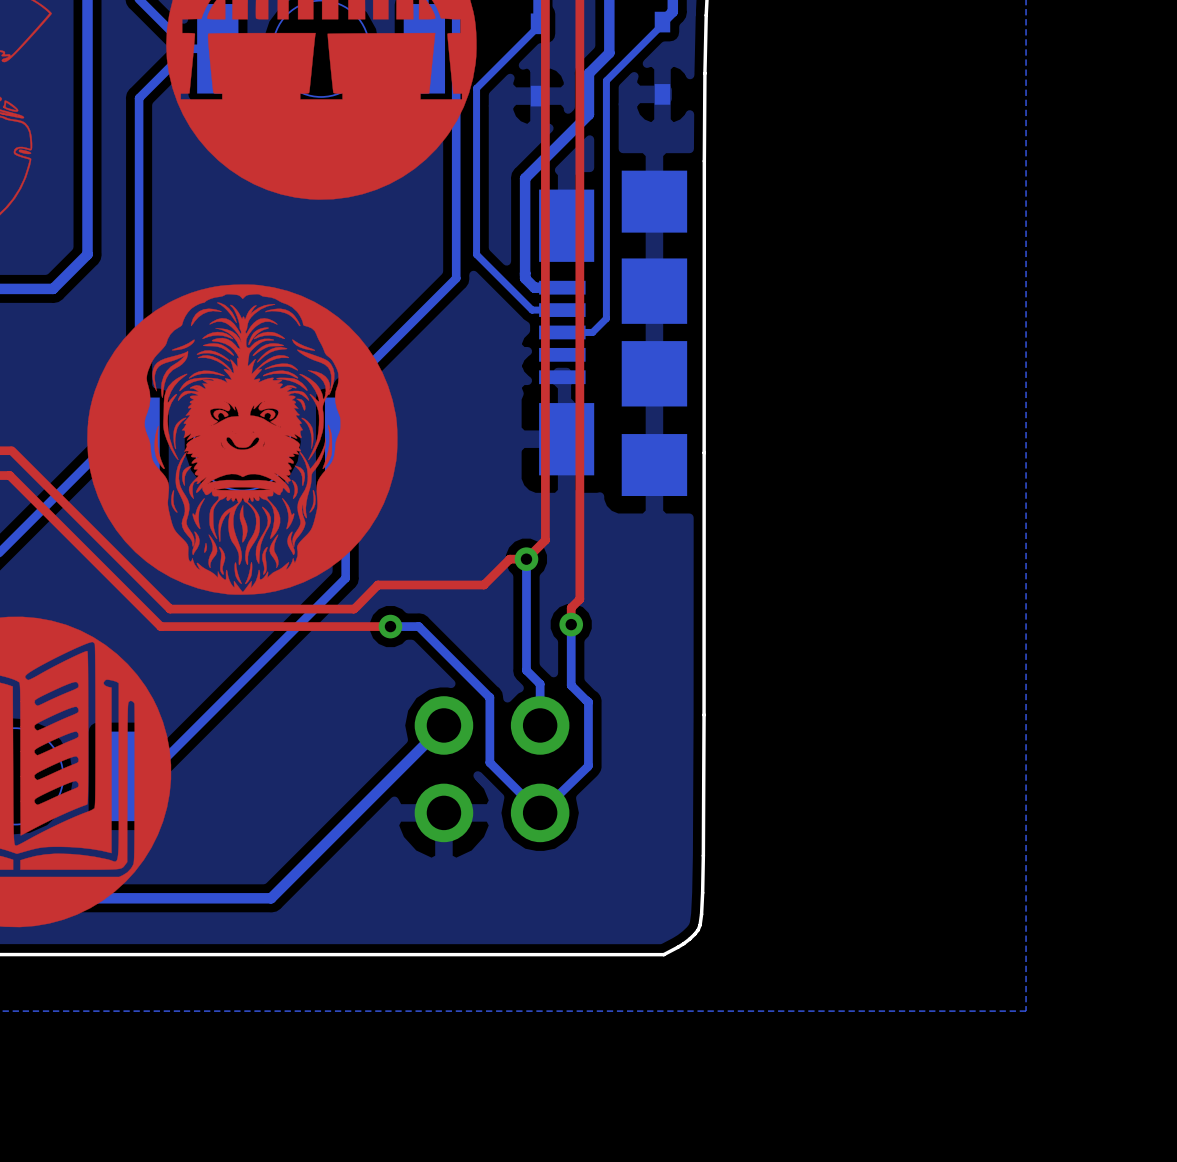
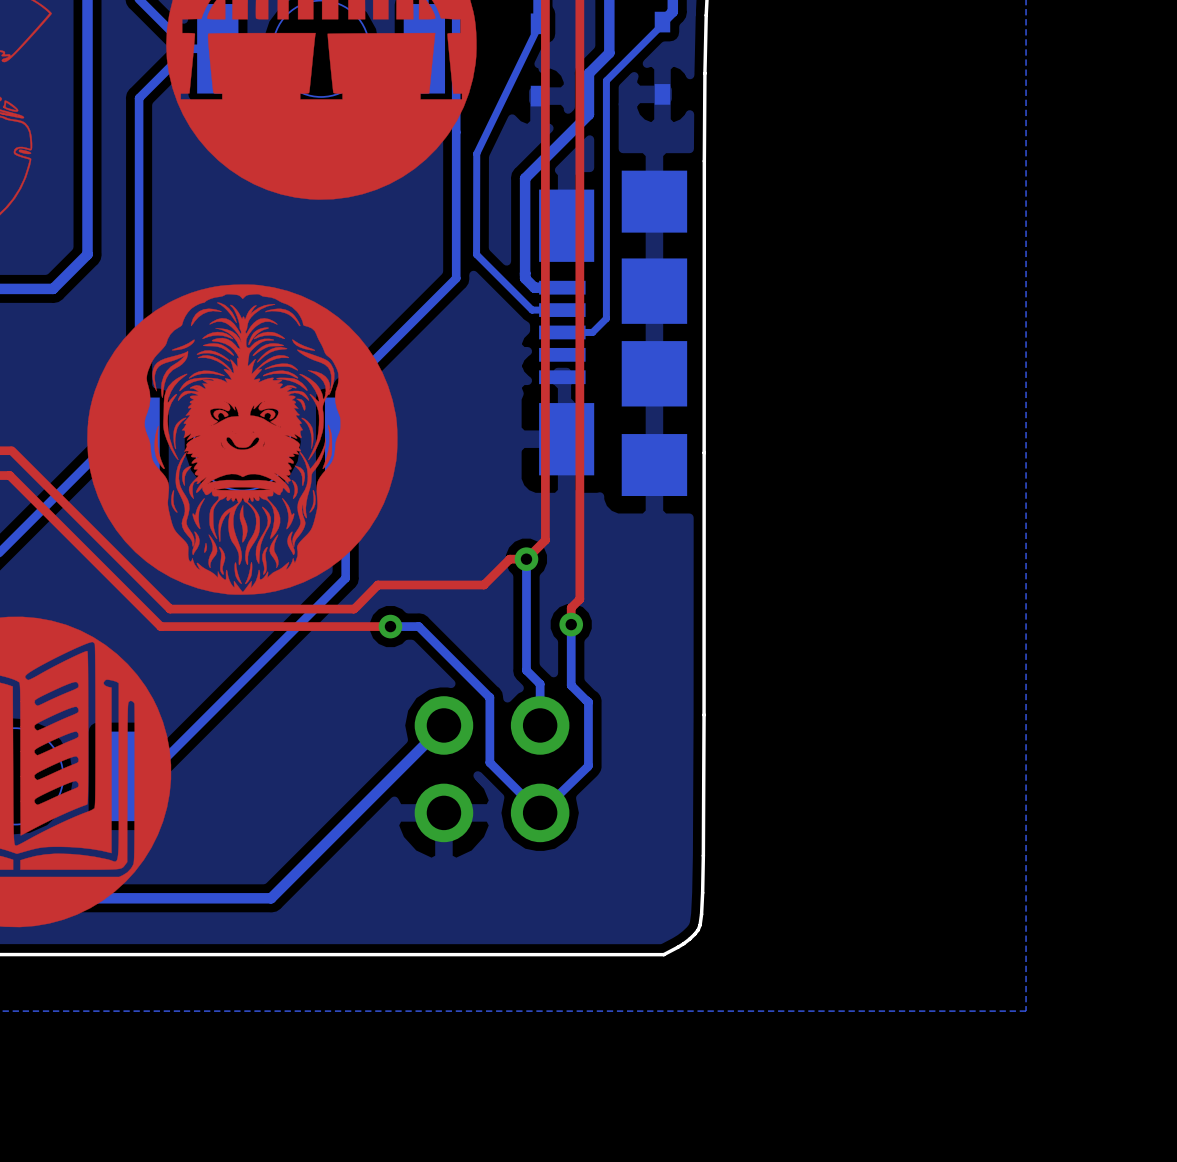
bottom track: (538, 26) (476, 88) (476, 254) -> (538, 26) (476, 153) (476, 254)

